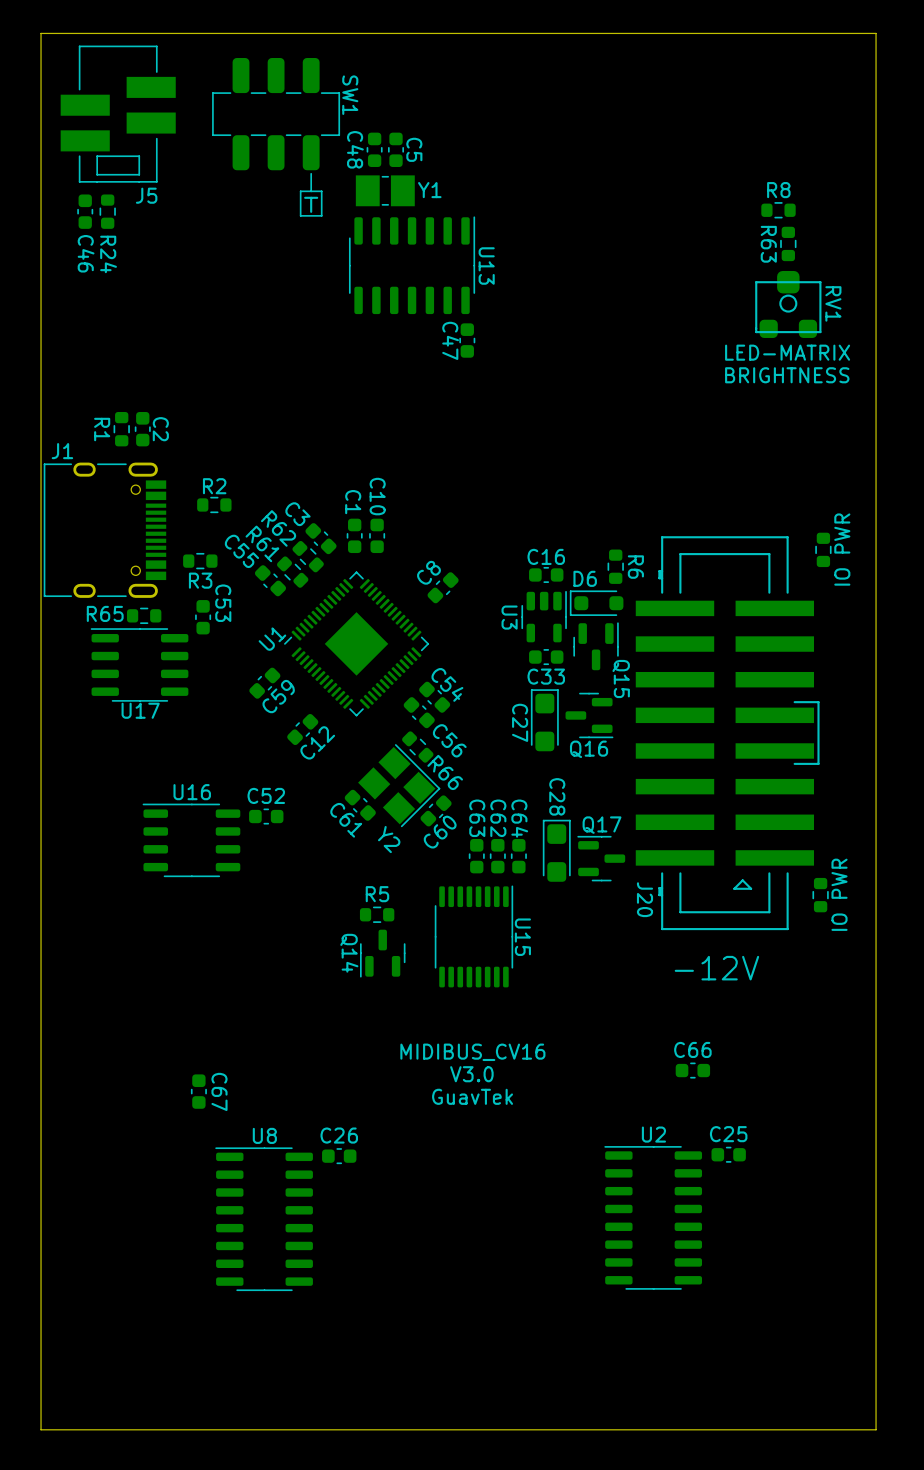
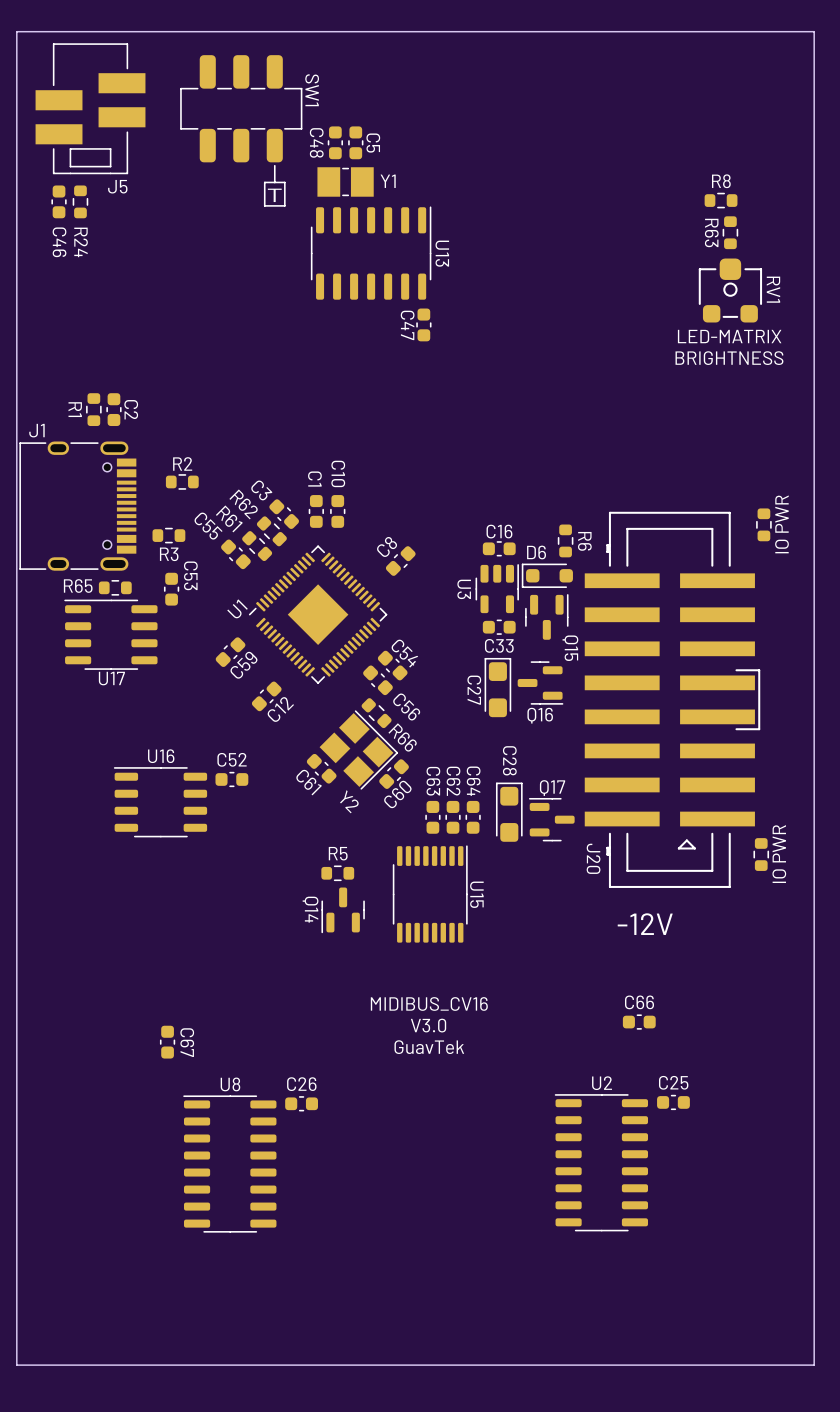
RV1 footprint: [755, 270, 822, 338] -> [698, 258, 763, 323]

